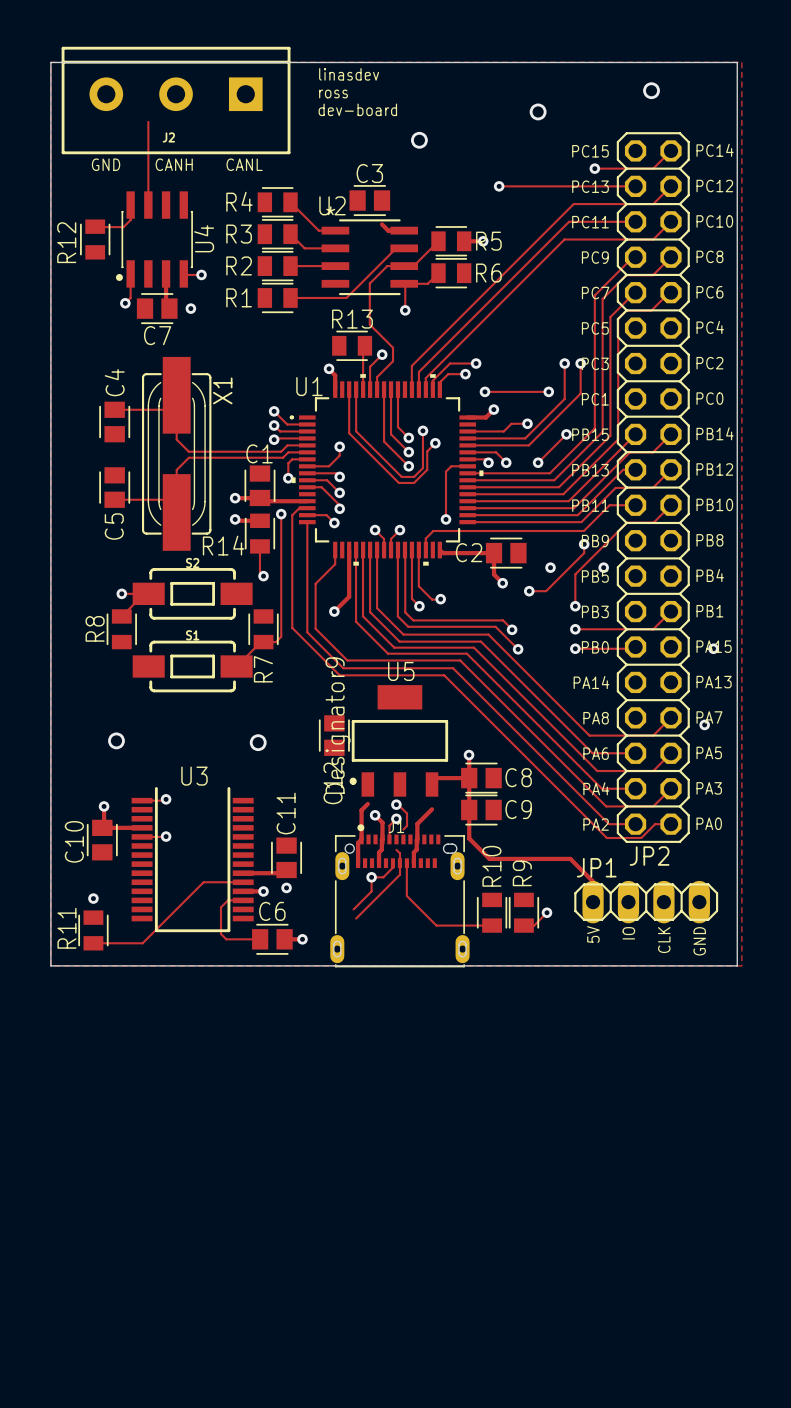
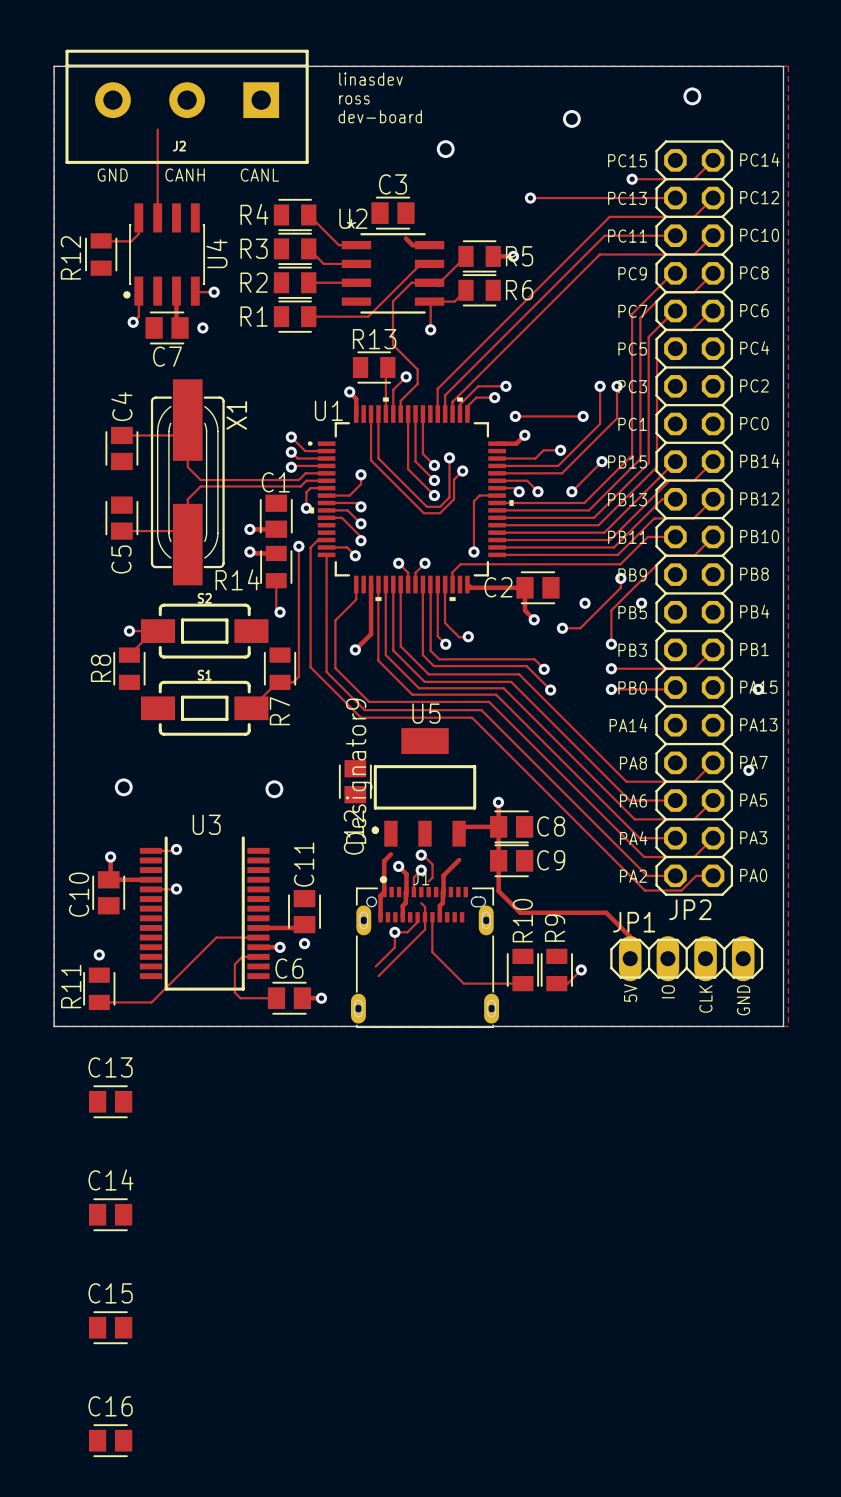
track: (263, 501) (307, 501) -> none
C13: none -> (110, 1101)
C14: none -> (110, 1214)
C15: none -> (110, 1327)
C16: none -> (110, 1440)

